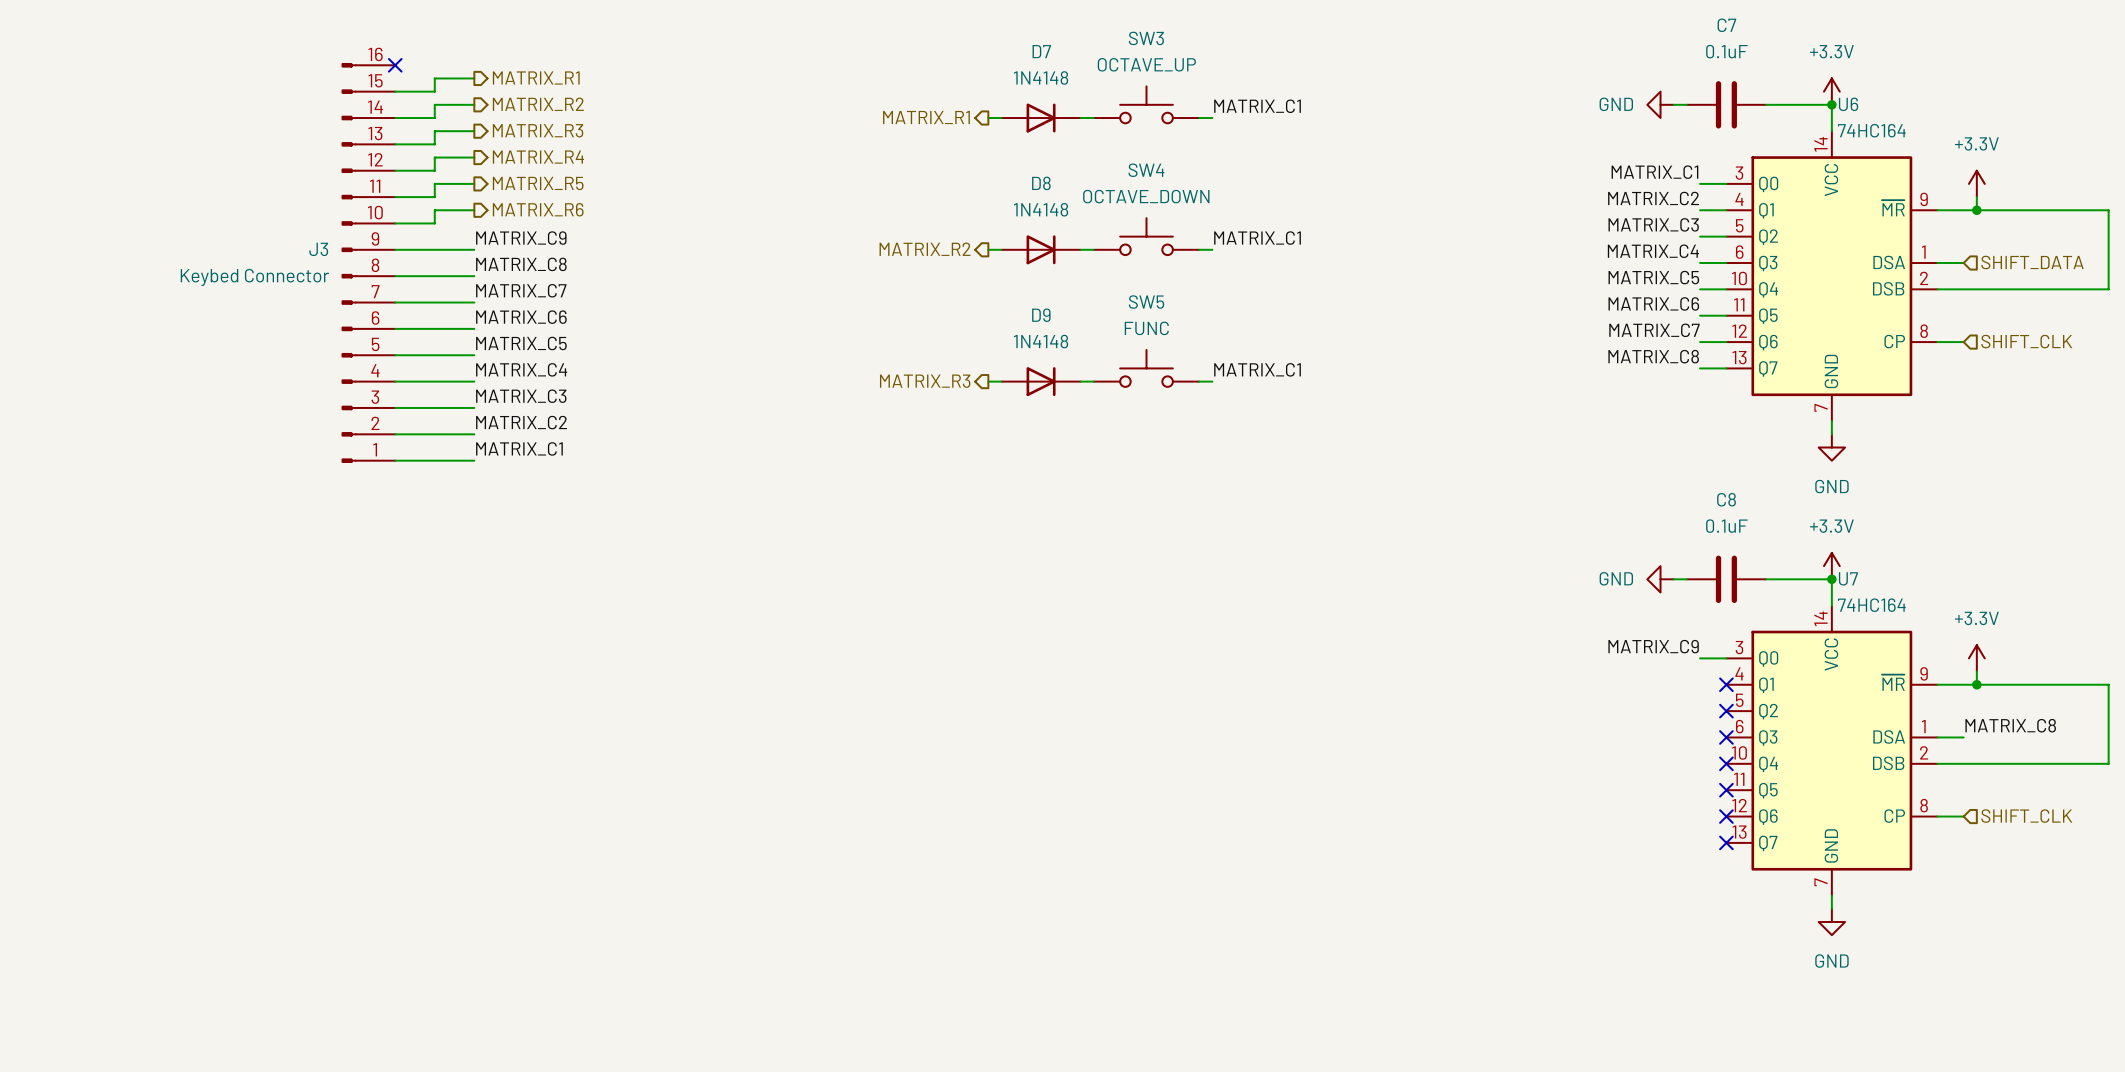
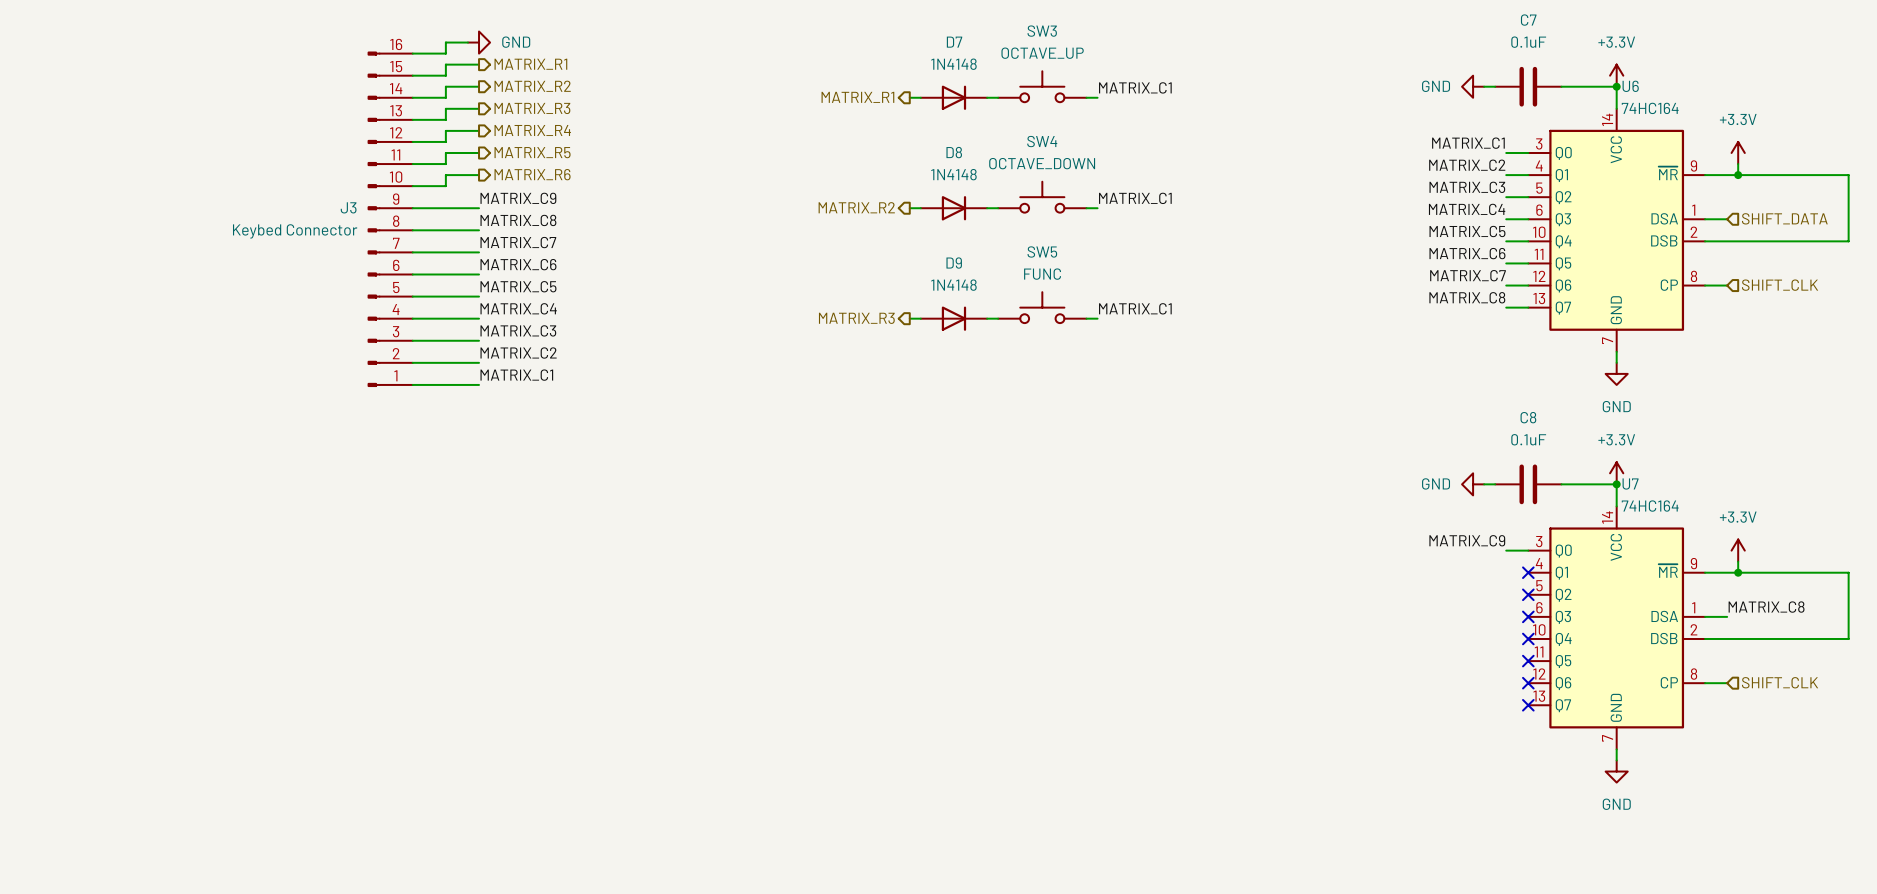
wire: none -> (467, 42) (445, 42) (445, 53) (412, 53)
power symbol: none -> GND (479, 42)
no-connect mark: (395, 65) -> none

